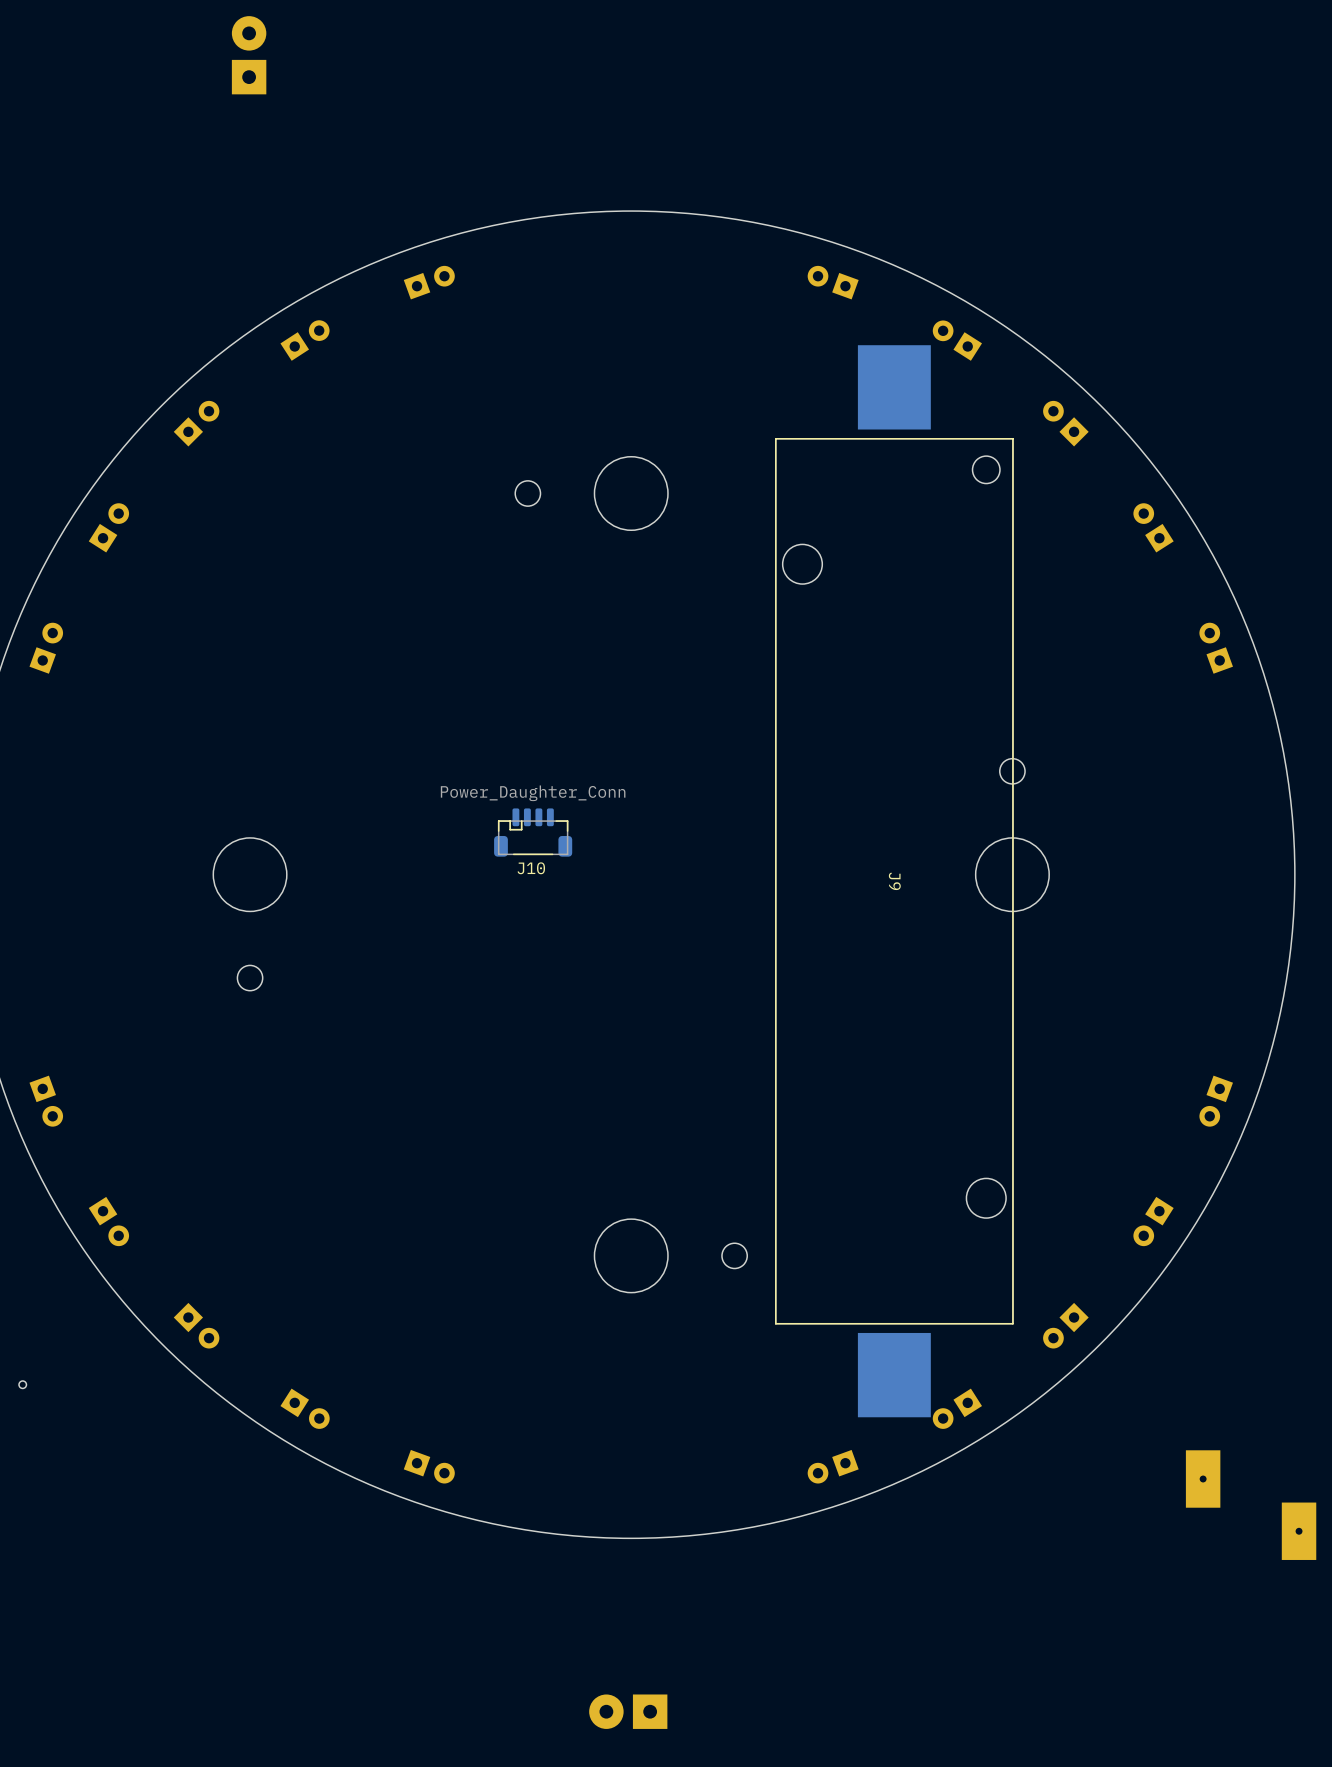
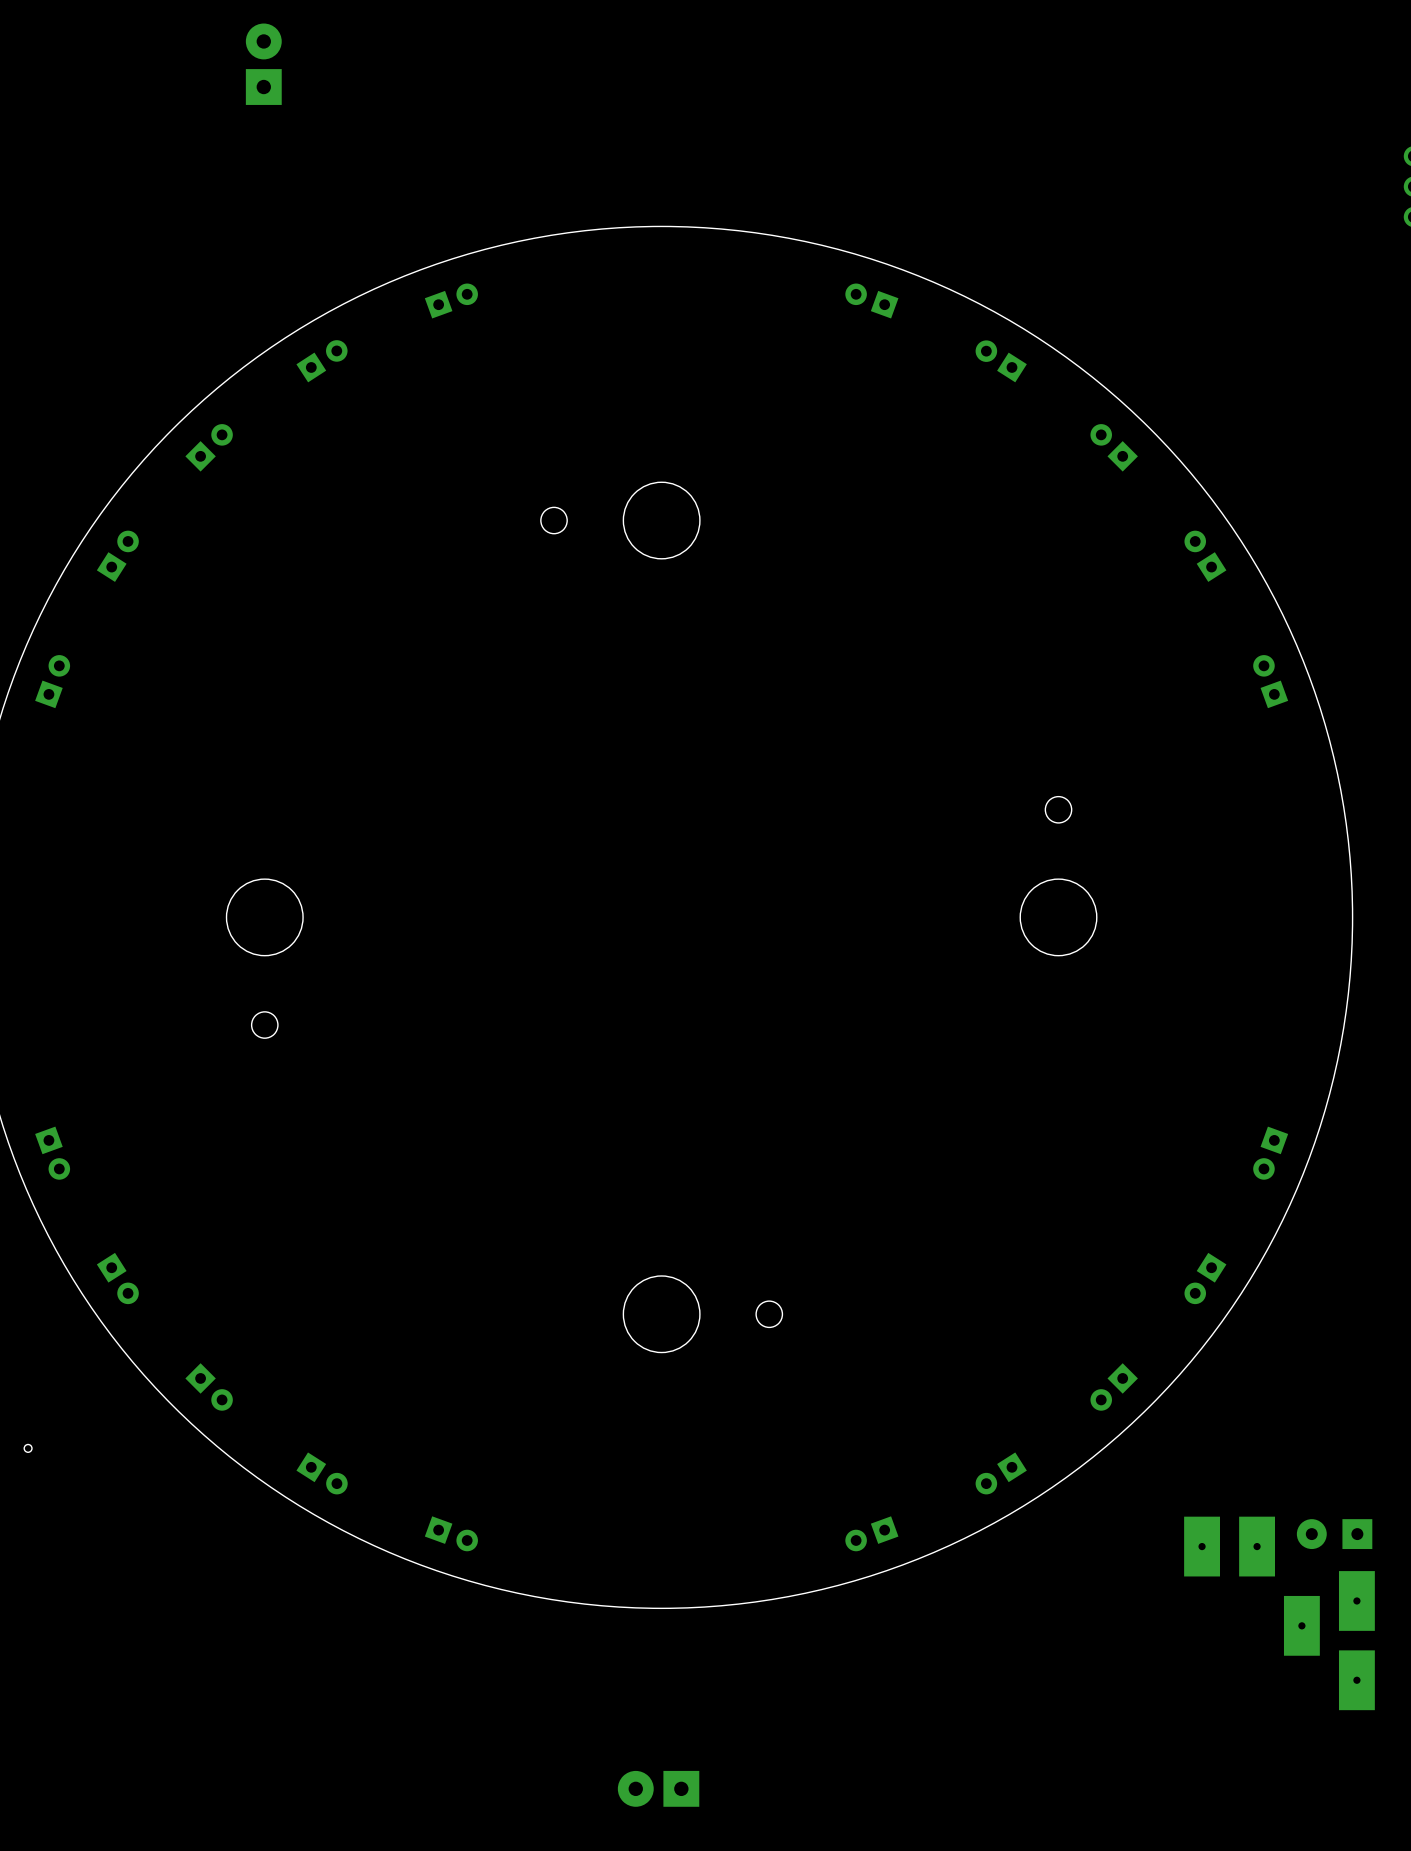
J10: Power_Daughter_Conn (533, 832) -> none
J9: (894, 881) -> none
part: none -> (1334, 1534)
part: none -> (1202, 1546)
part: none -> (1301, 1625)
part: none -> (1356, 1680)

